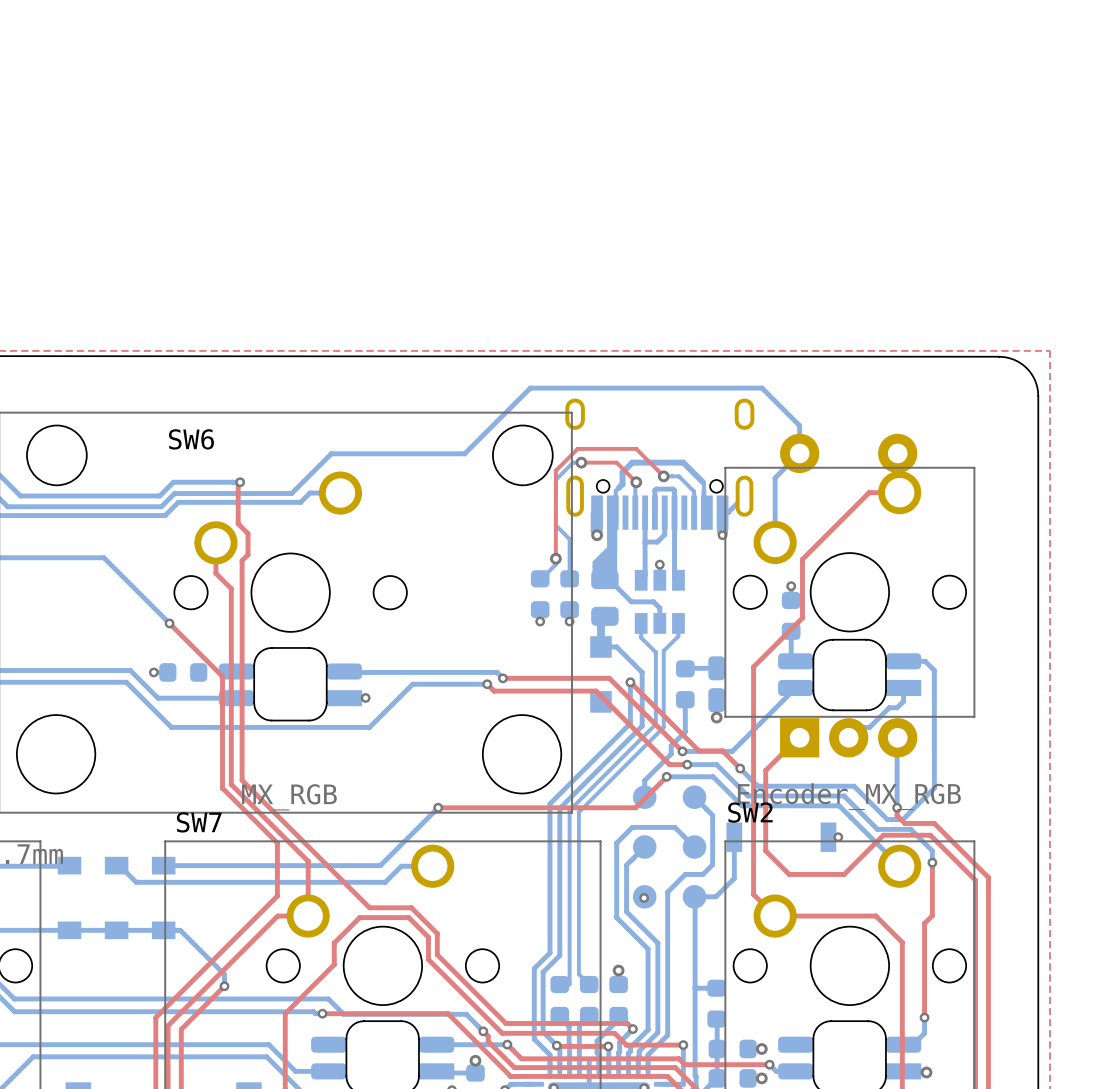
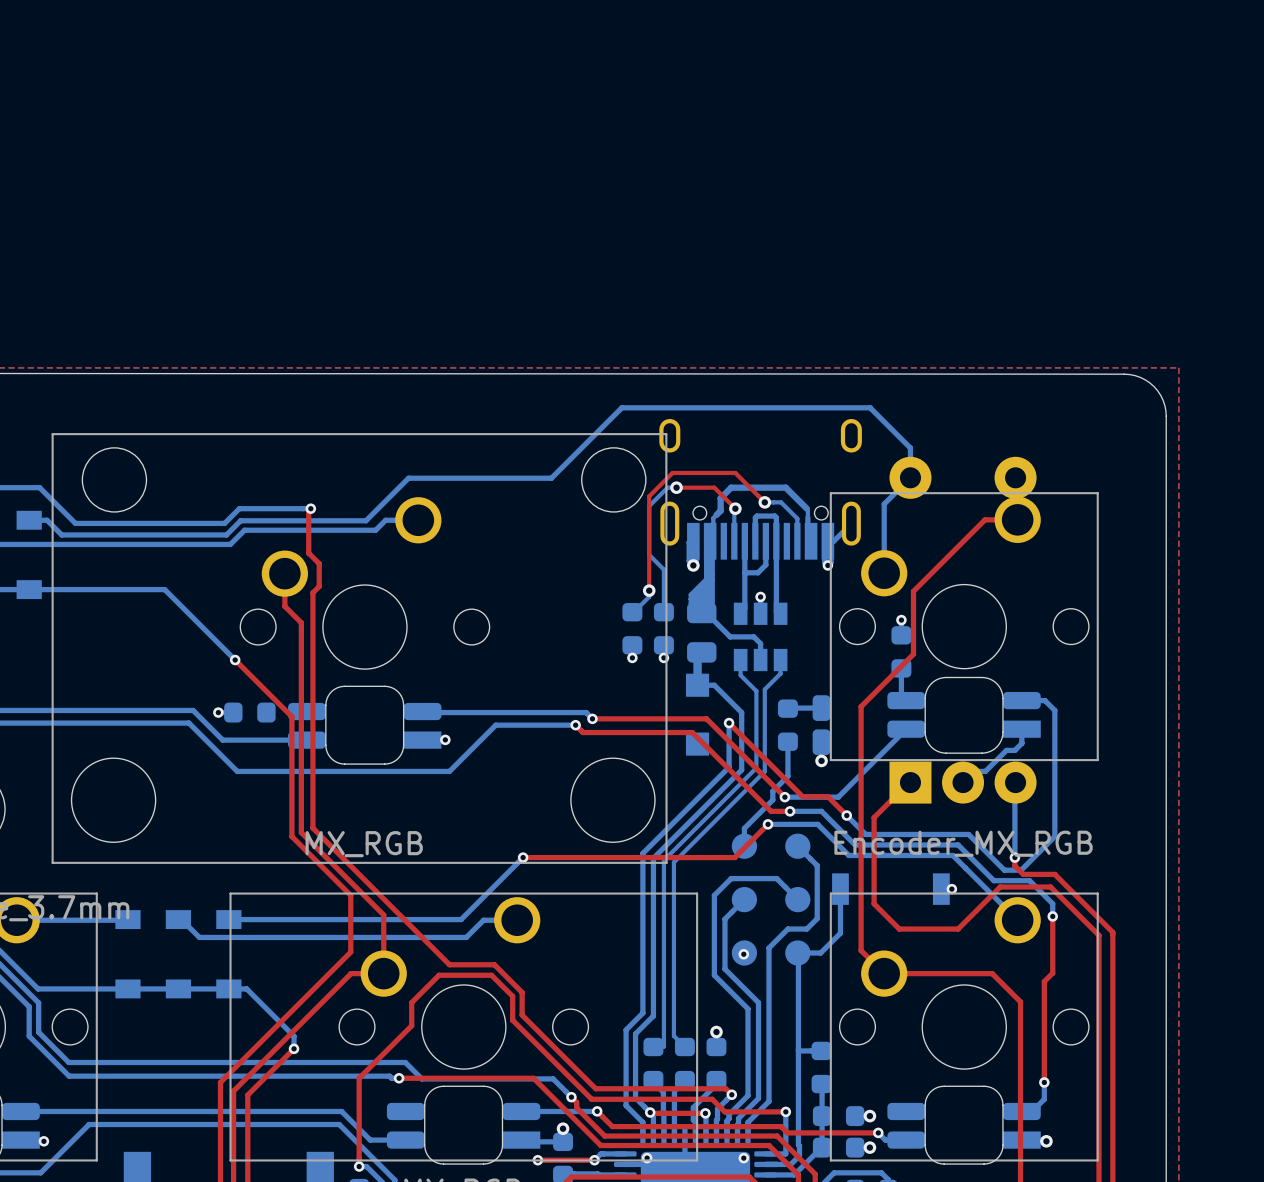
SW6 name: SW6 (191, 439) -> none
SW2 name: SW2 (750, 812) -> none
SW7 name: SW7 (199, 822) -> none

